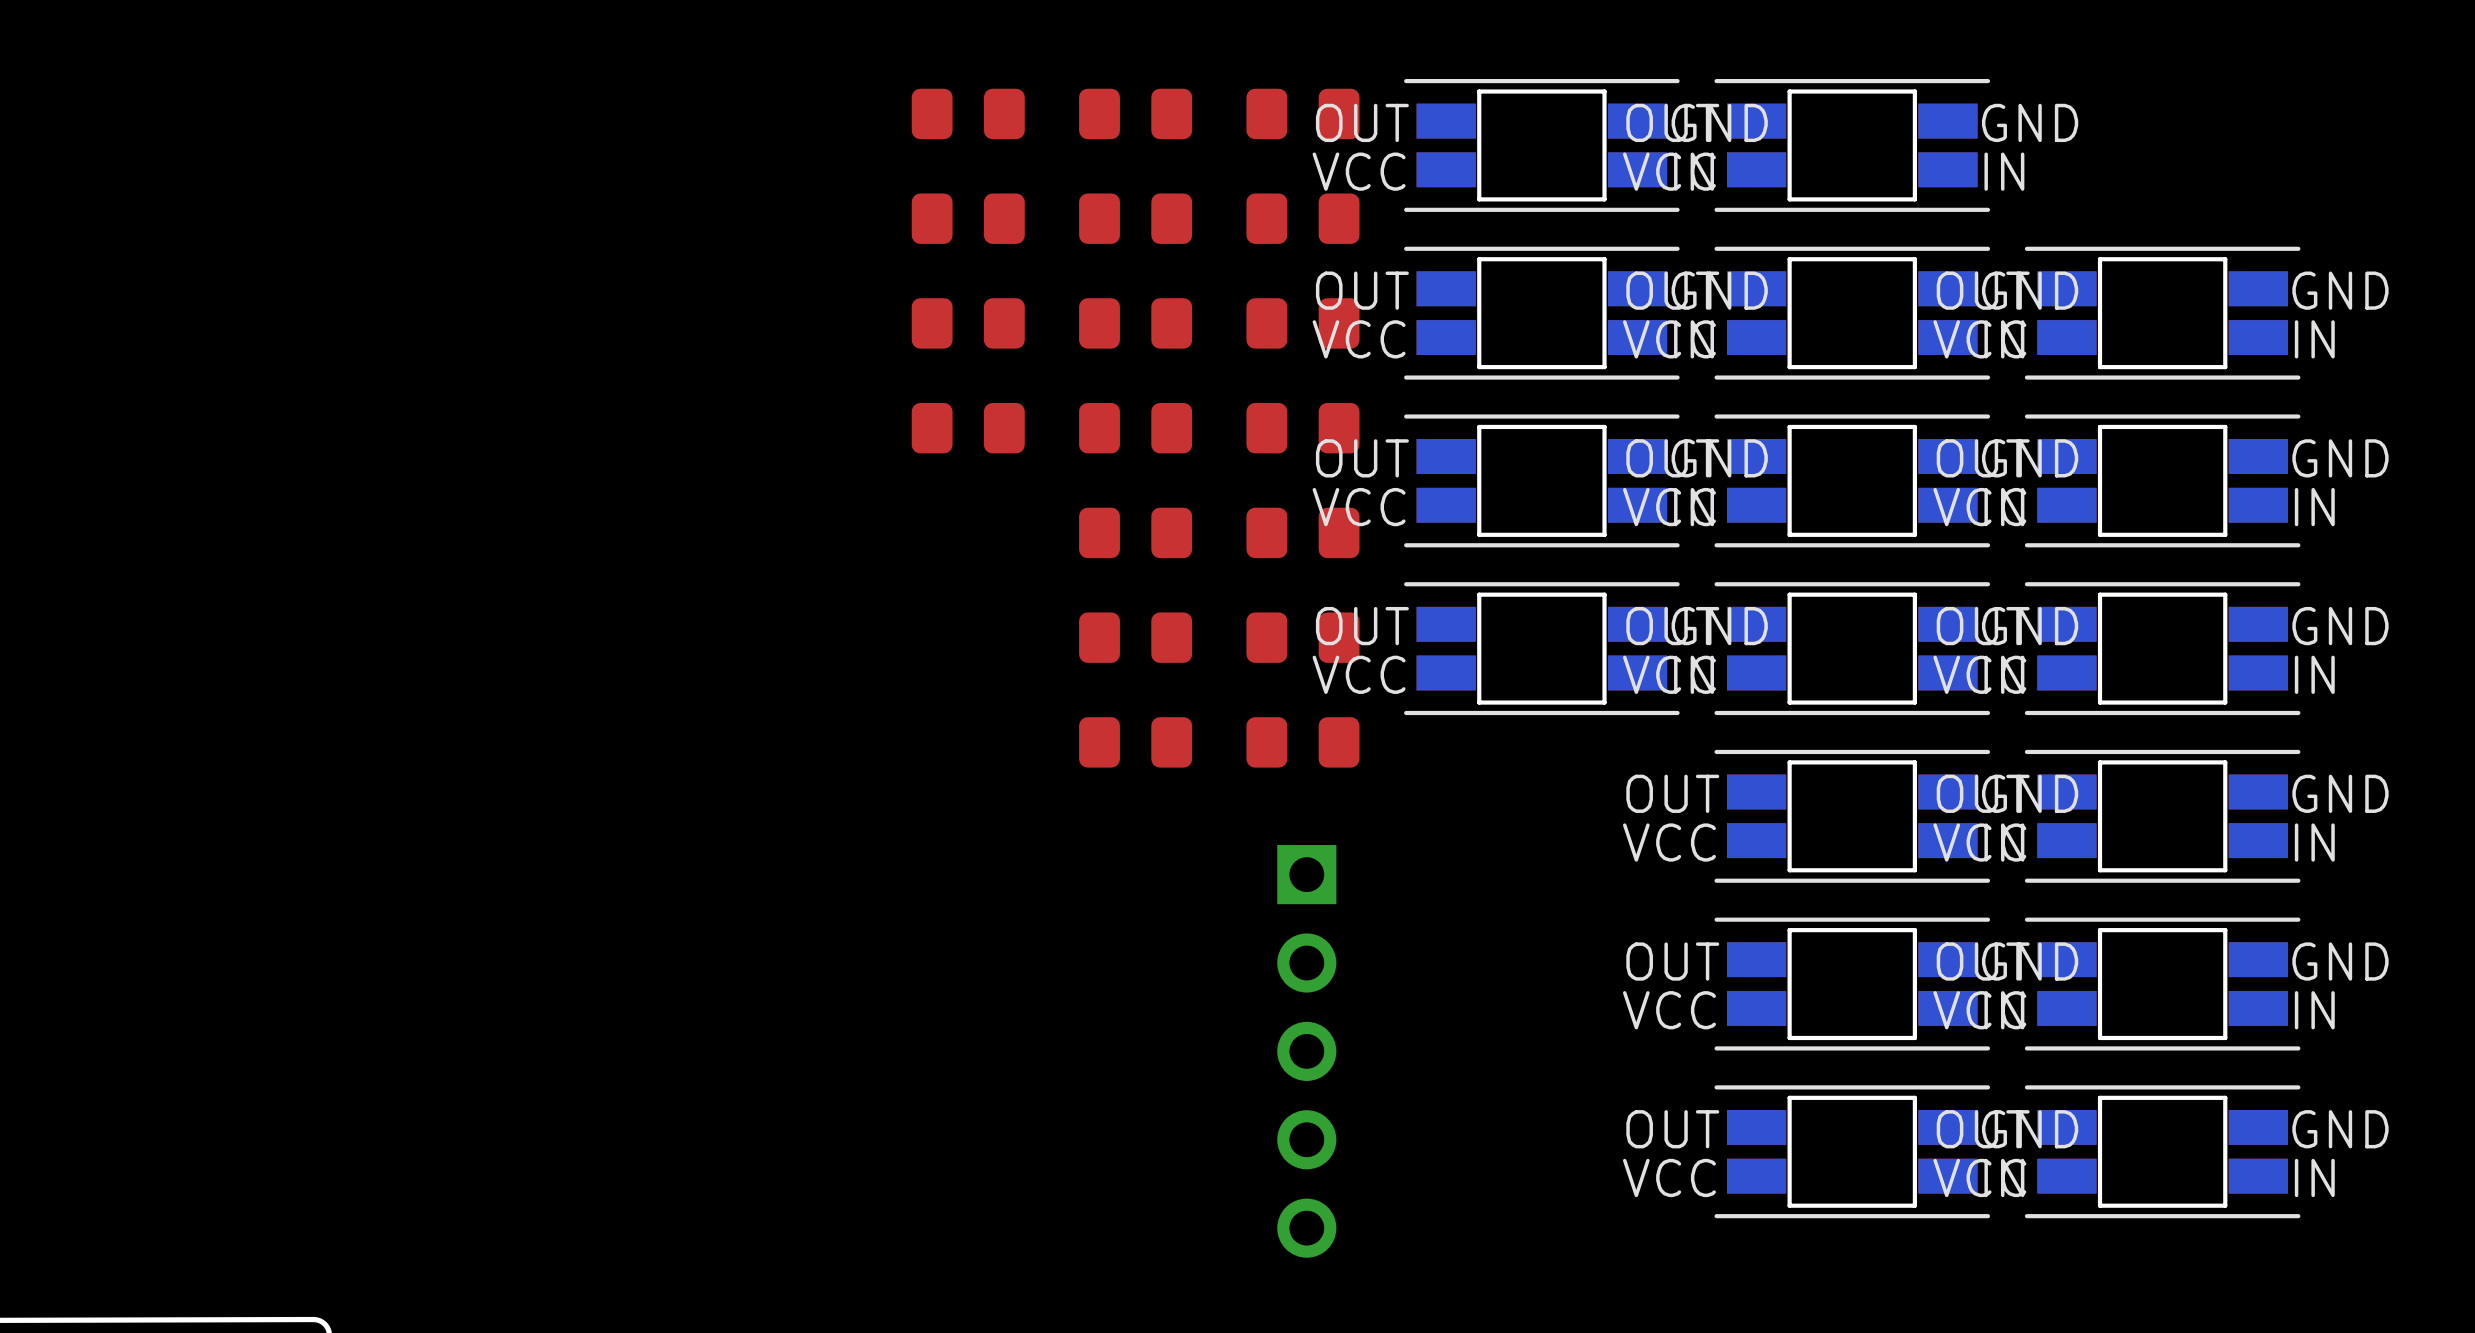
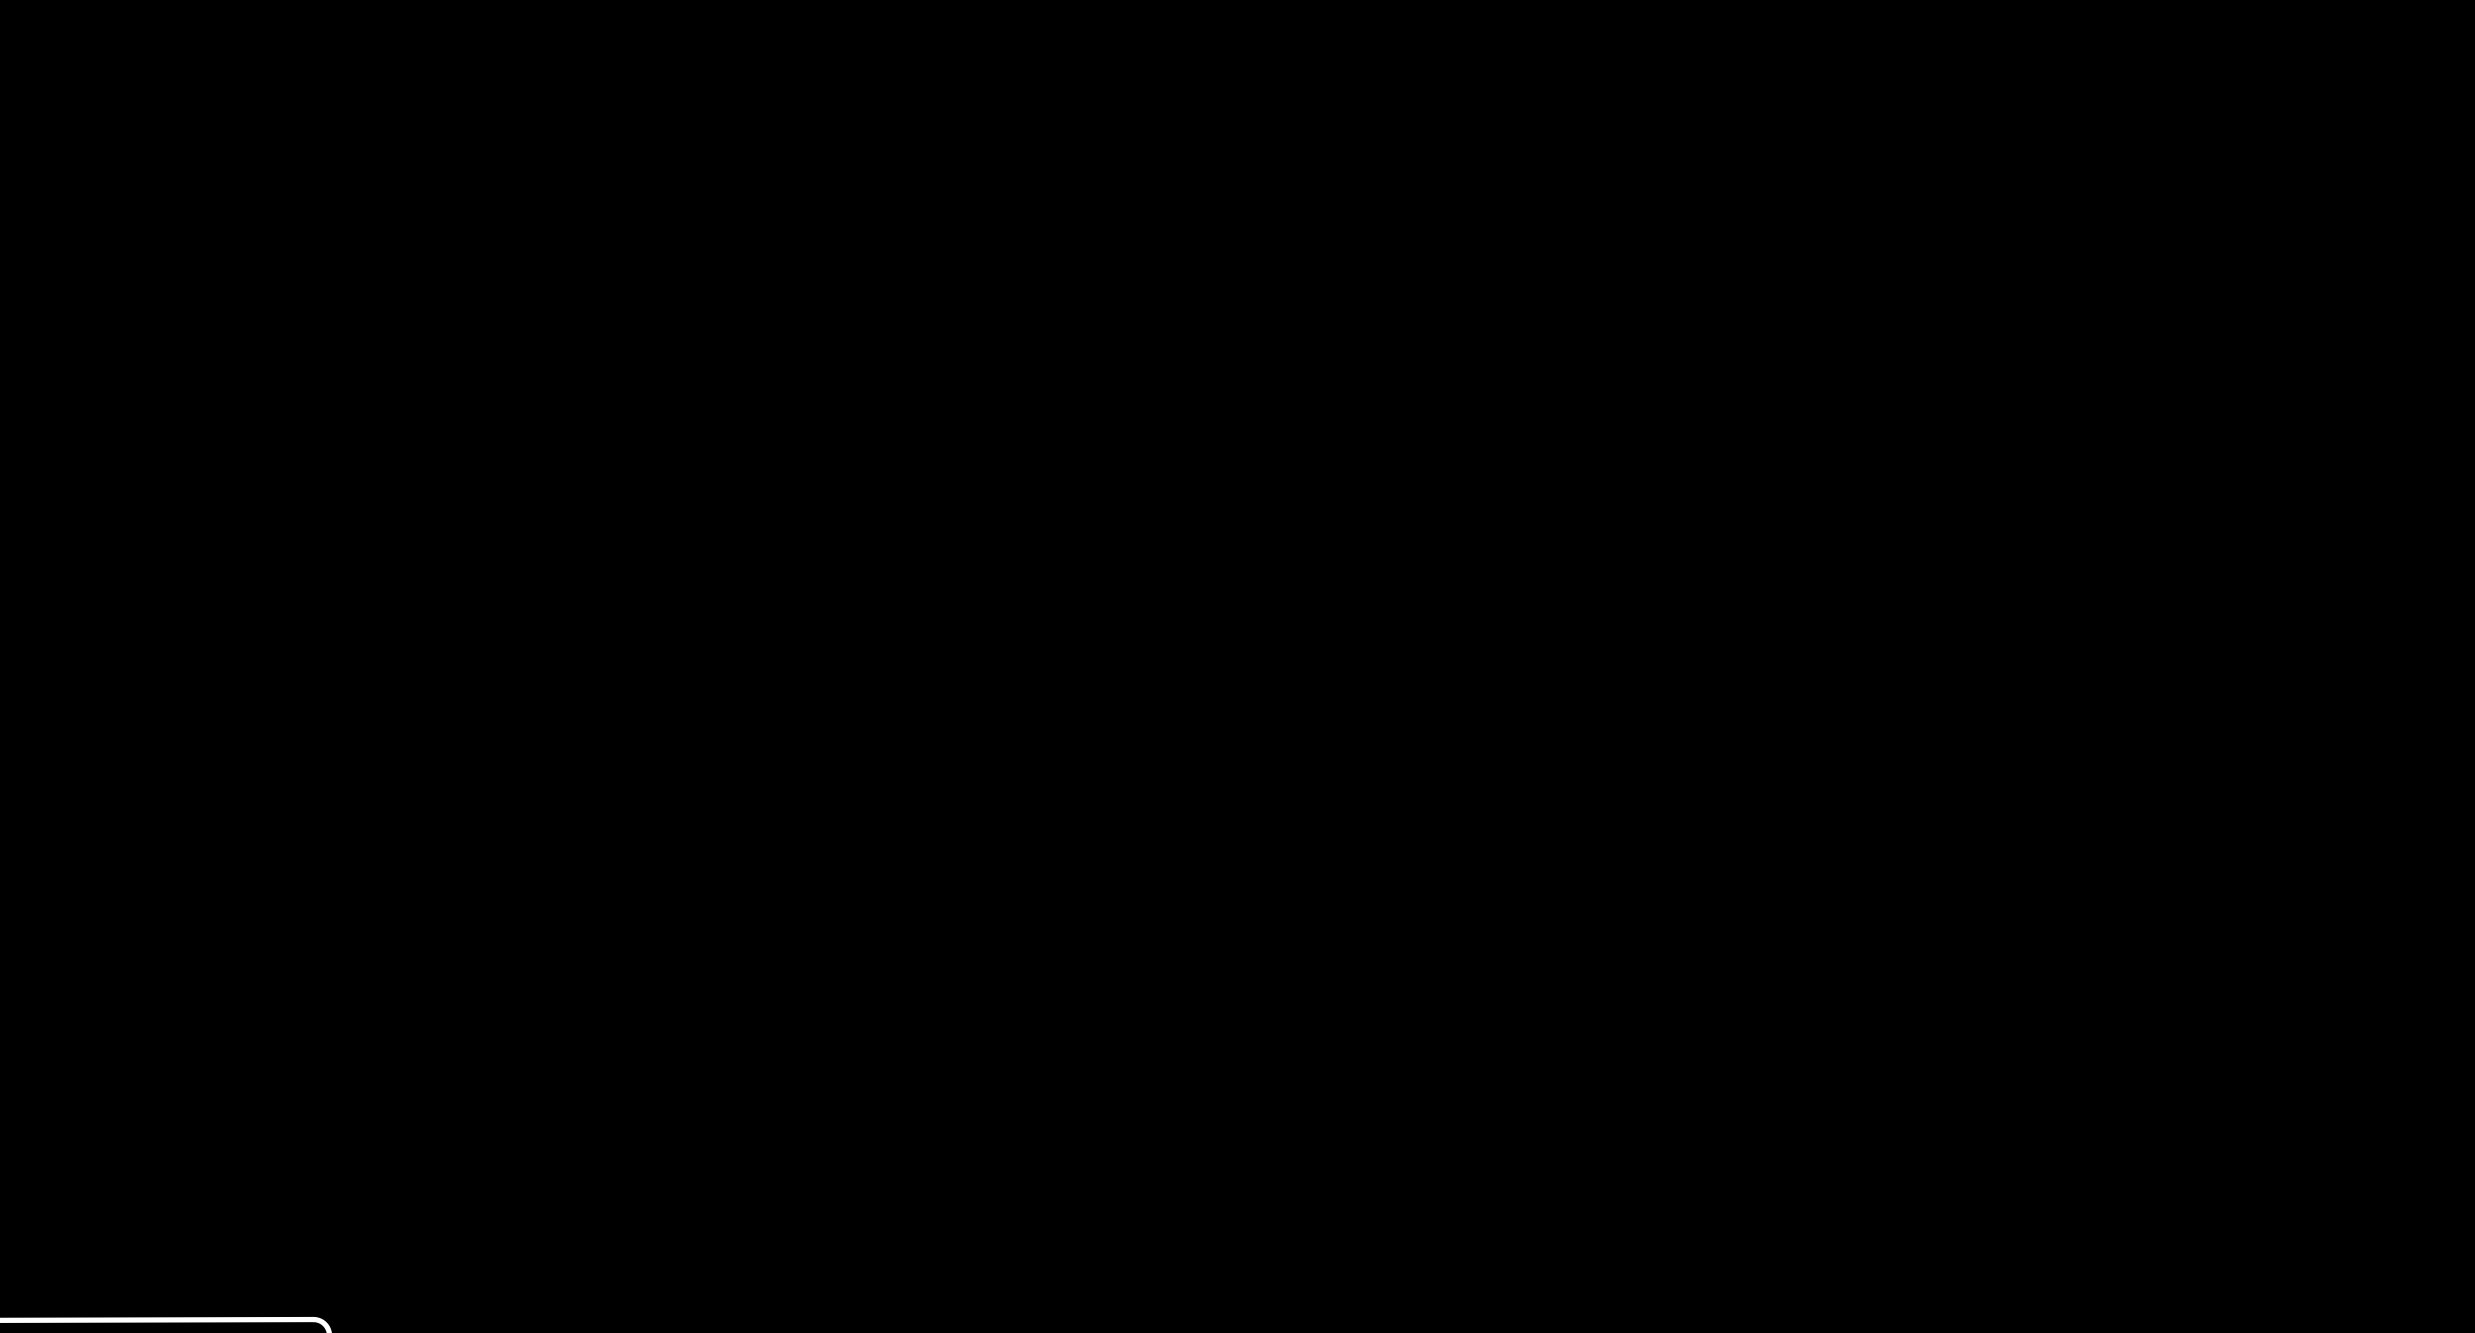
part: (968, 113) -> none
part: (1135, 113) -> none
part: (1302, 113) -> none
part: (1541, 145) -> none
part: (1852, 145) -> none
part: (968, 218) -> none
part: (1135, 218) -> none
part: (1302, 218) -> none
part: (1541, 313) -> none
part: (1852, 313) -> none
part: (2162, 313) -> none
part: (968, 323) -> none
part: (1135, 323) -> none
part: (1302, 323) -> none
part: (968, 428) -> none
part: (1135, 428) -> none
part: (1302, 428) -> none
part: (1541, 480) -> none
part: (1852, 480) -> none
part: (2162, 480) -> none
part: (1135, 532) -> none
part: (1302, 532) -> none
part: (1135, 637) -> none
part: (1302, 637) -> none
part: (1541, 648) -> none
part: (1852, 648) -> none
part: (2162, 648) -> none
part: (1135, 742) -> none
part: (1302, 742) -> none
part: (1852, 816) -> none
part: (2162, 816) -> none
part: (1852, 984) -> none
part: (2162, 984) -> none
part: (1306, 1051) -> none
part: (1852, 1151) -> none
part: (2162, 1151) -> none

